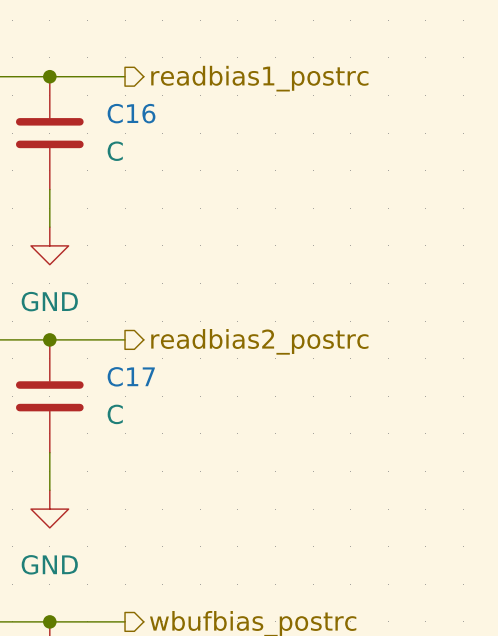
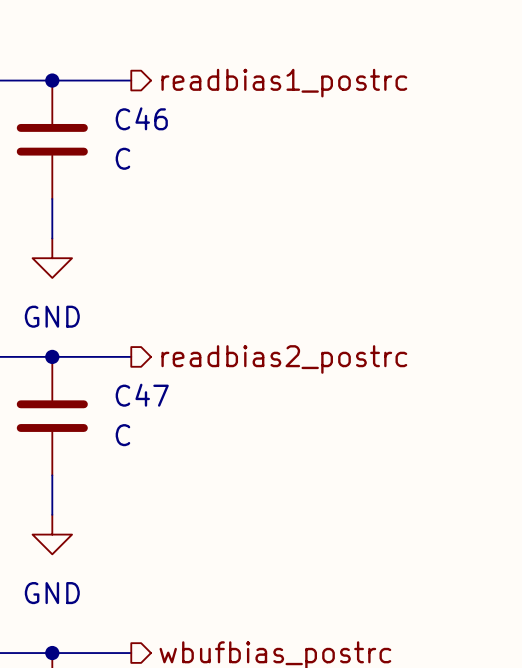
C16 name: C16 (131, 113) -> C46 (141, 118)
C17 name: C17 (131, 376) -> C47 (142, 395)

